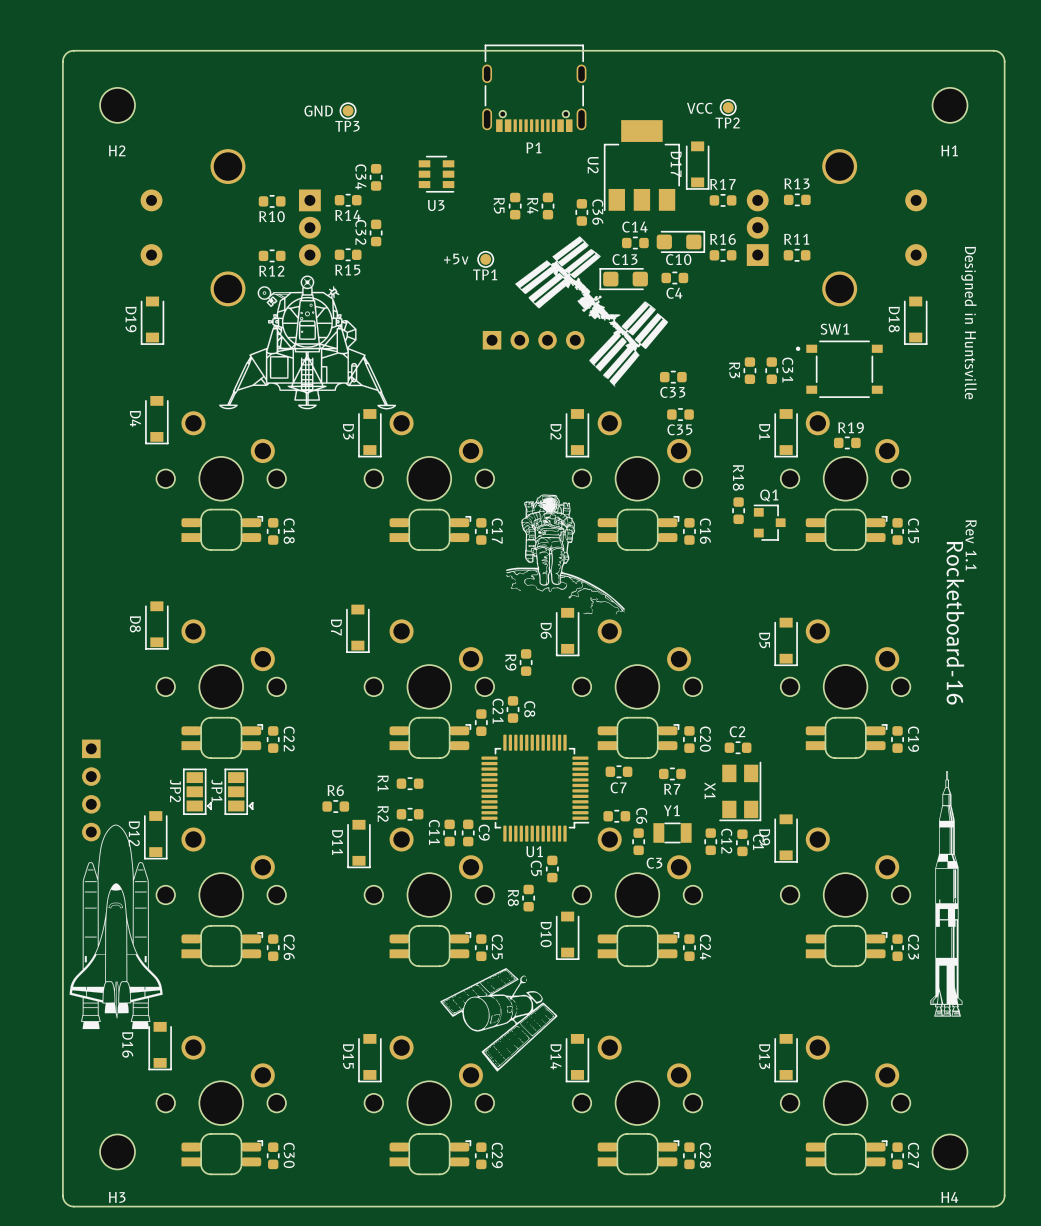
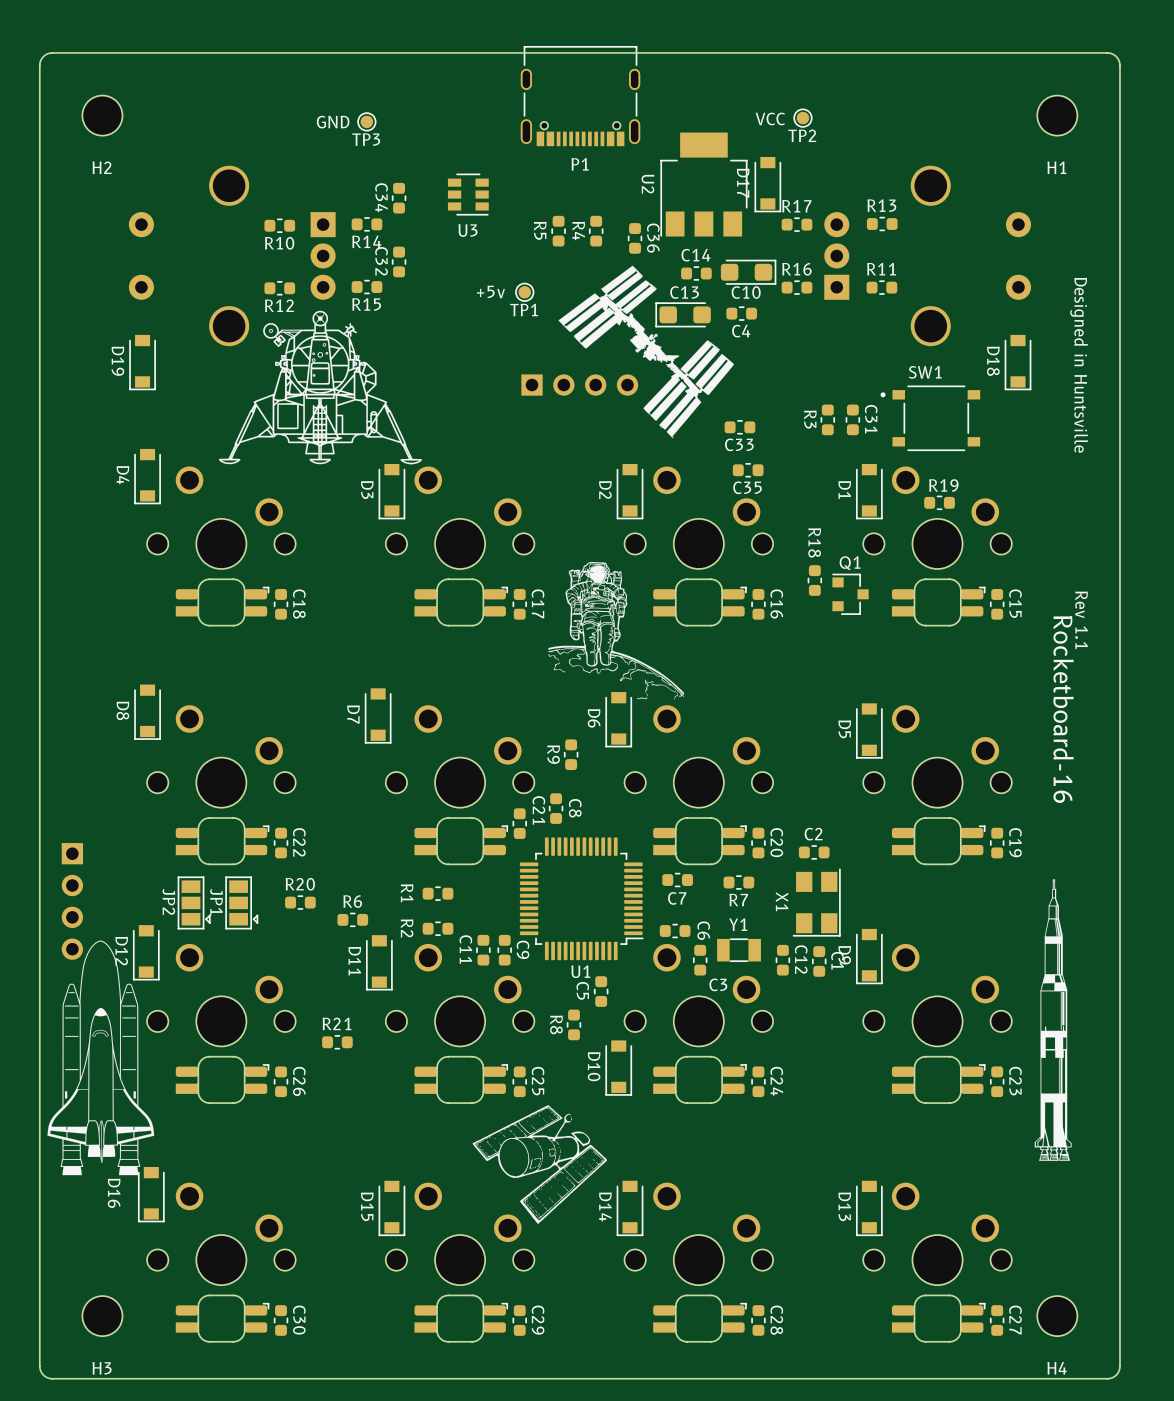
R20: none -> (300, 902)
R21: none -> (337, 1042)

